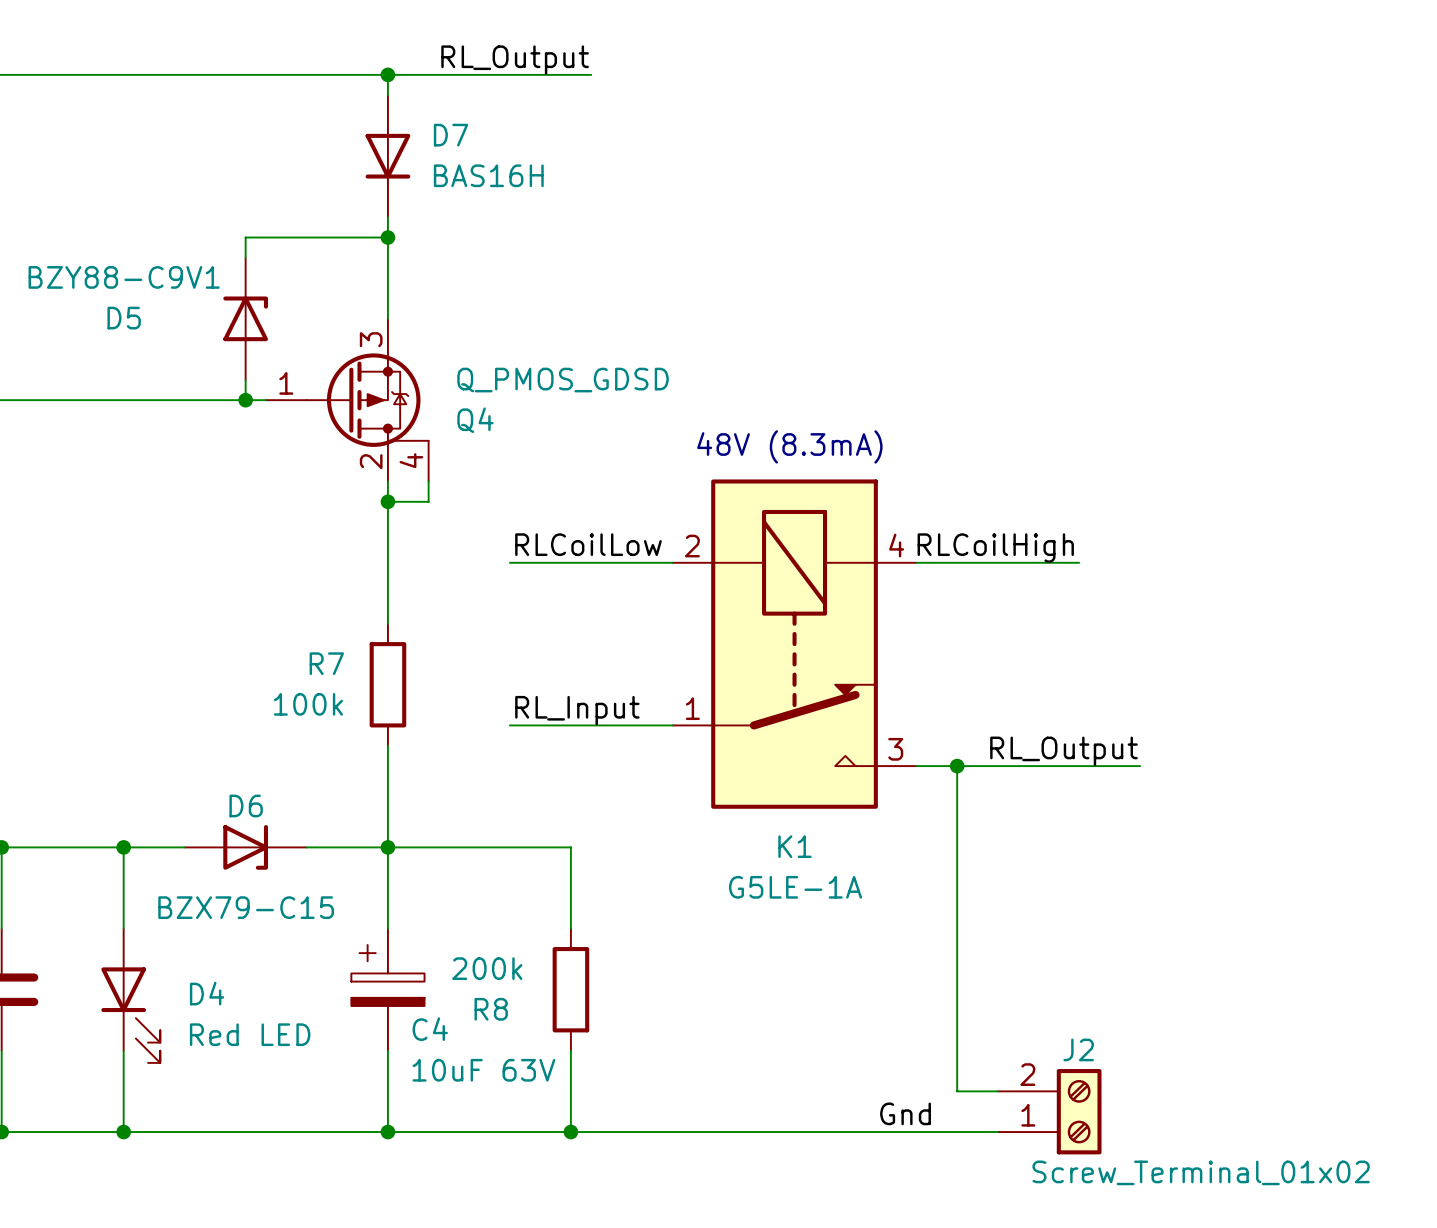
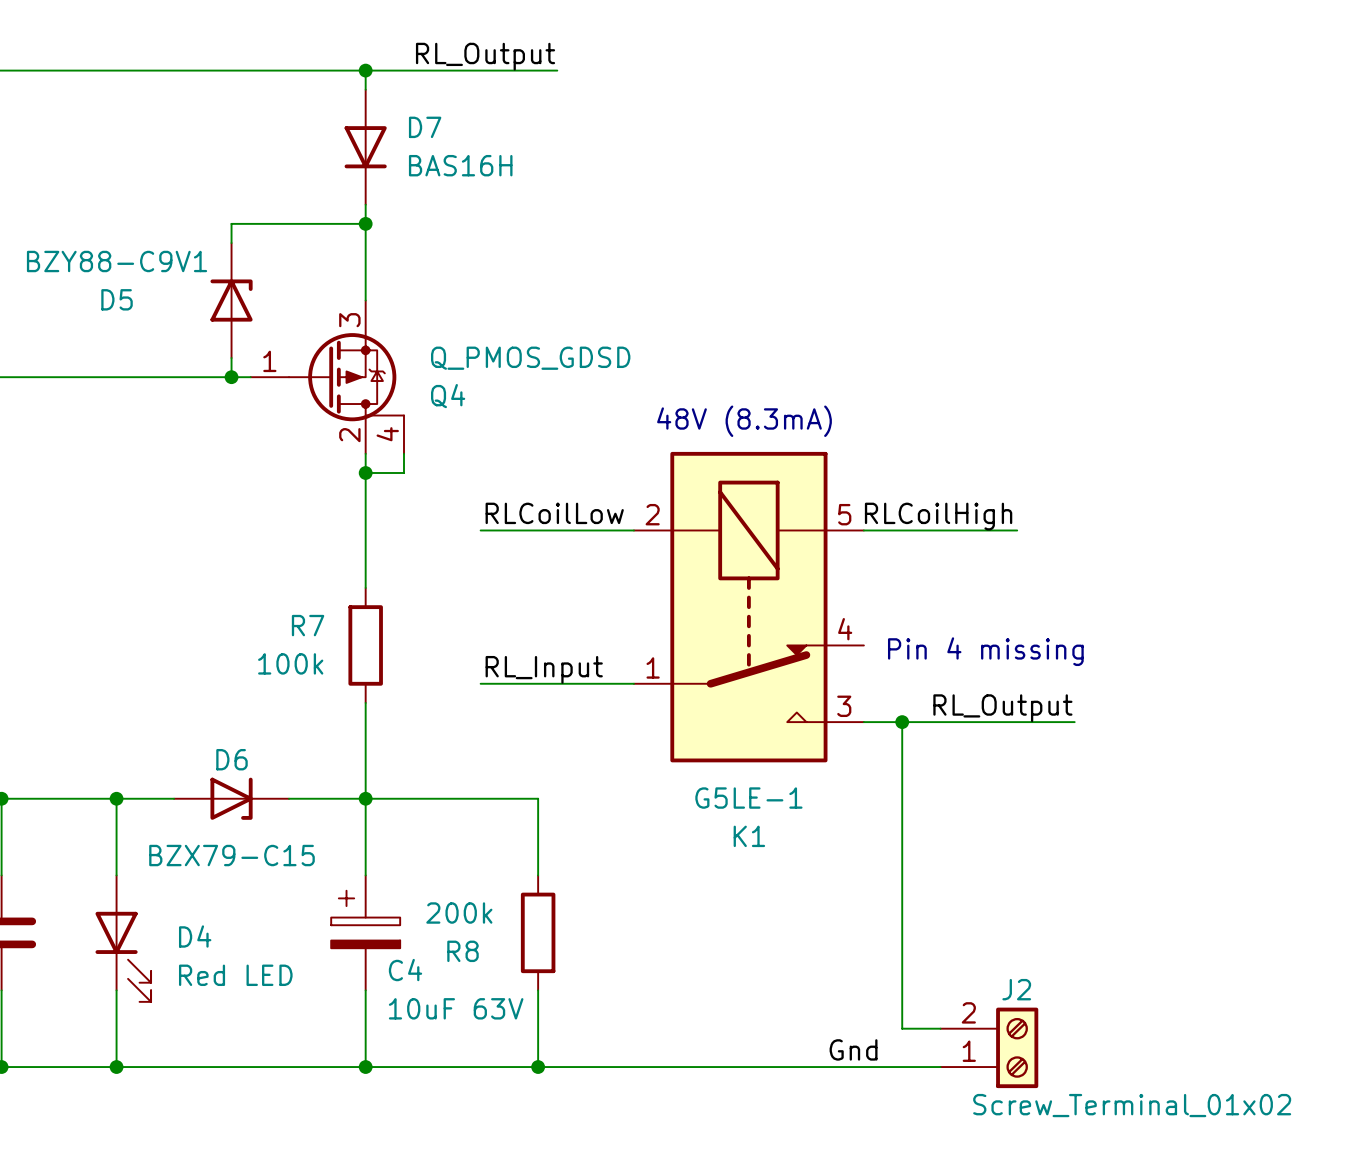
K1 symbol: [672, 479, 917, 809] -> [633, 451, 864, 763]
text: none -> Pin 4 missing (985, 651)
K1 name position: K1 (795, 846) -> K1 (749, 836)
K1 value: G5LE-1A (795, 887) -> G5LE-1 (748, 798)

